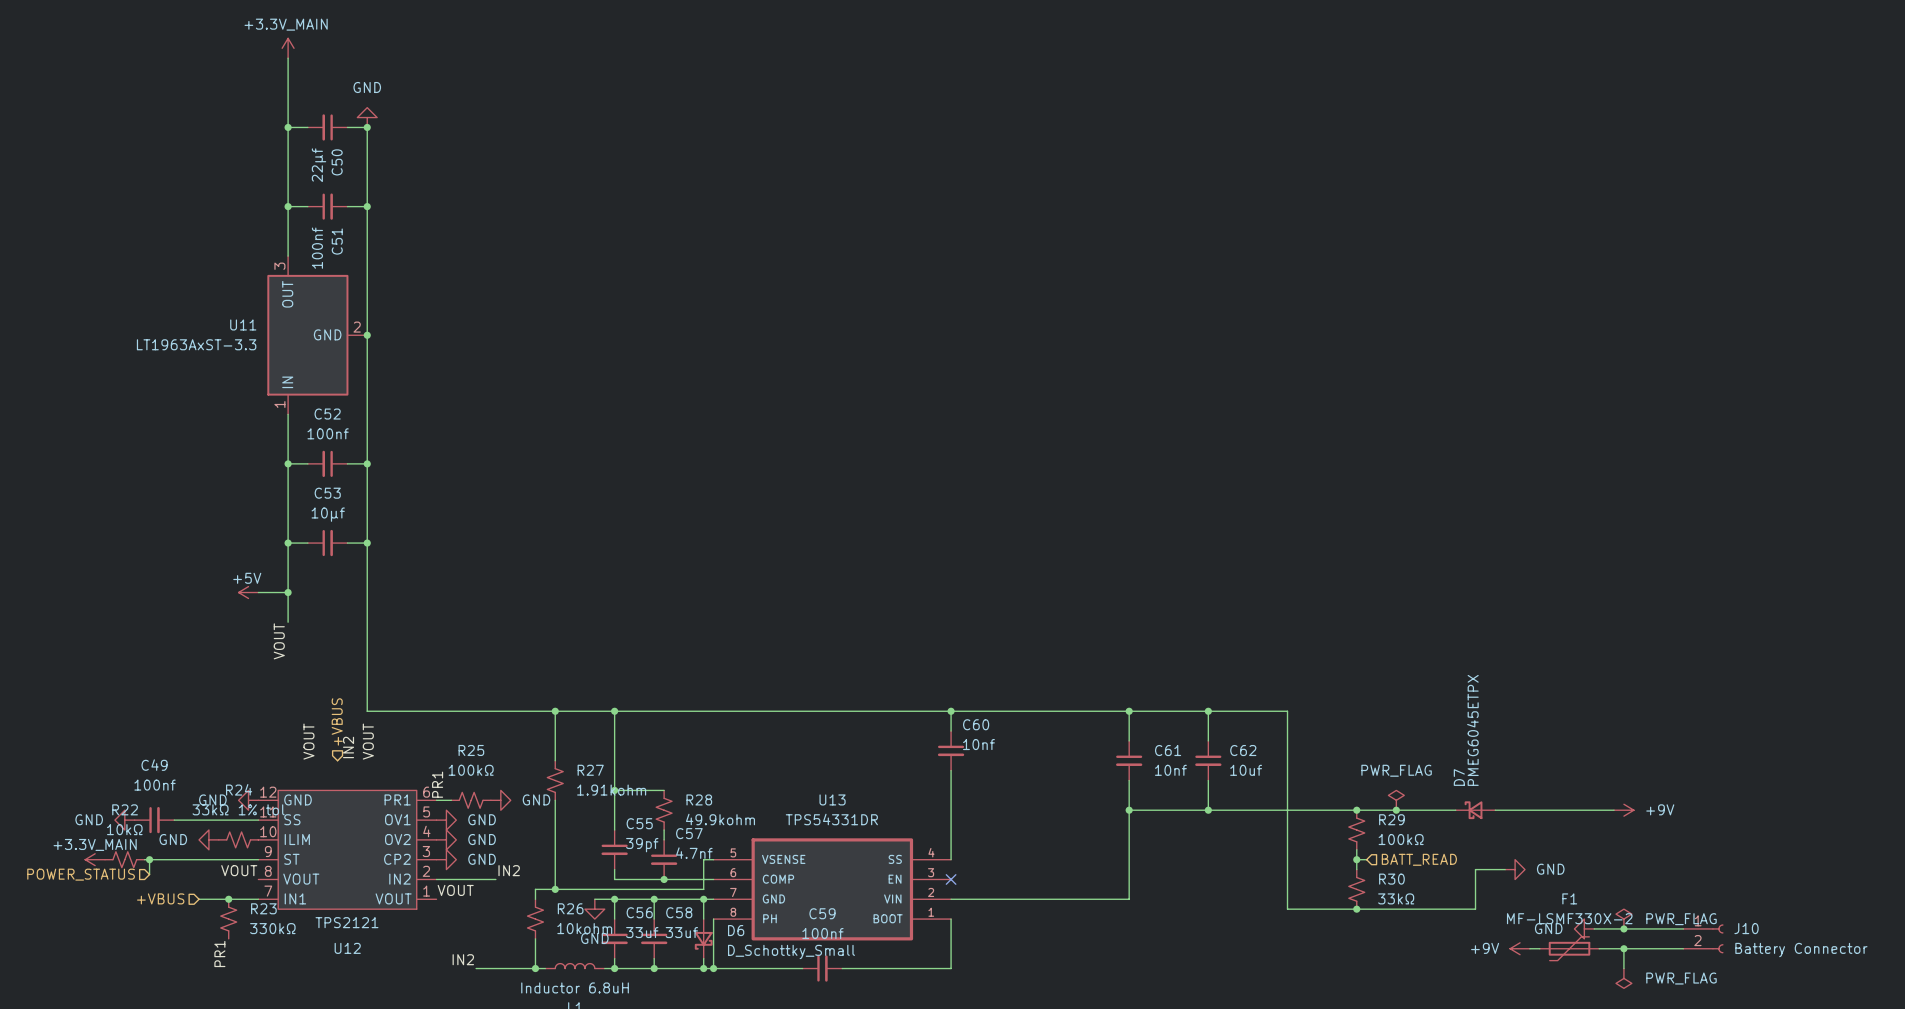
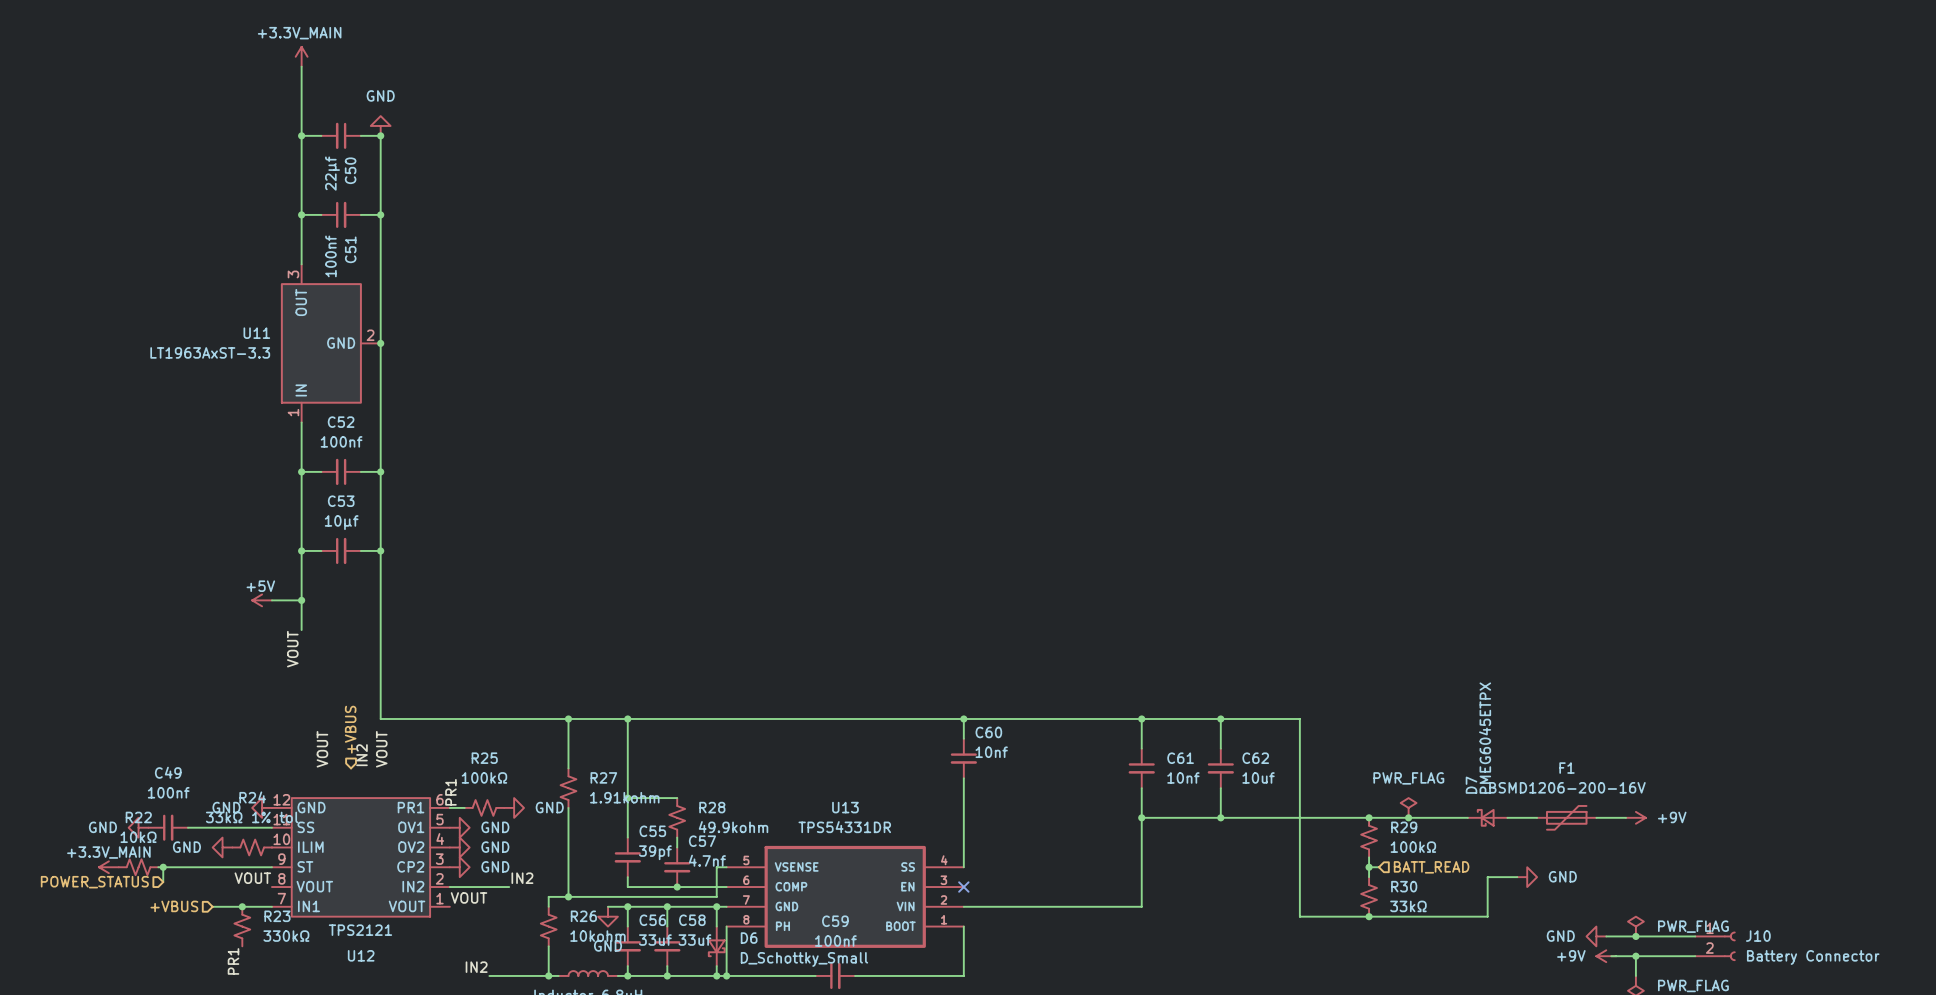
F1 value: MF-LSMF330X-2 (1569, 918) -> BSMD1206-200-16V (1567, 787)
power symbol position: +9V (1520, 948) -> +9V (1606, 956)
wire: (1529, 948) (1539, 948) -> none
F1 position: (1569, 948) -> (1566, 817)

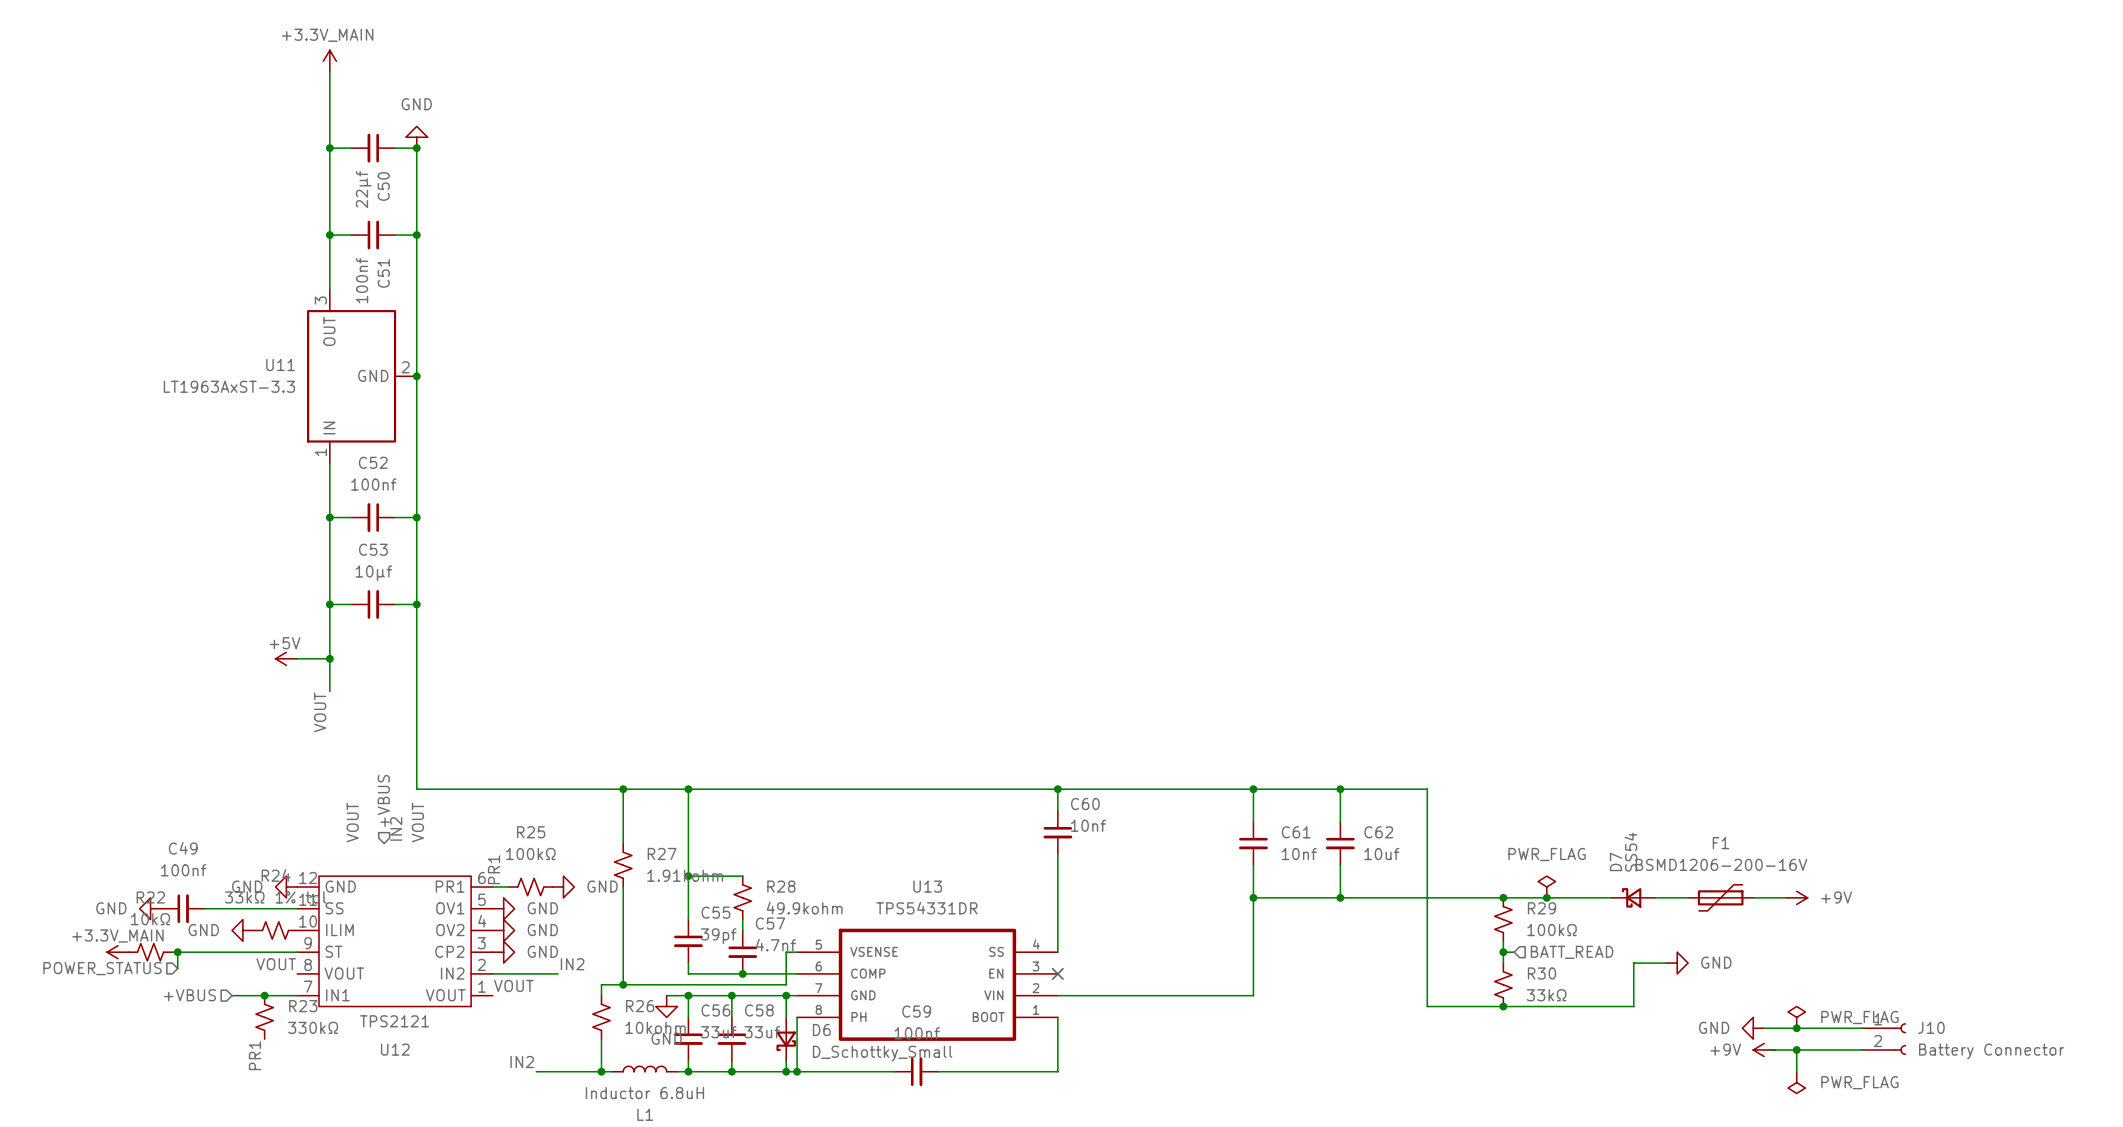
D7 value: PMEG6045ETPX (1485, 738) -> SS54 (1630, 852)

